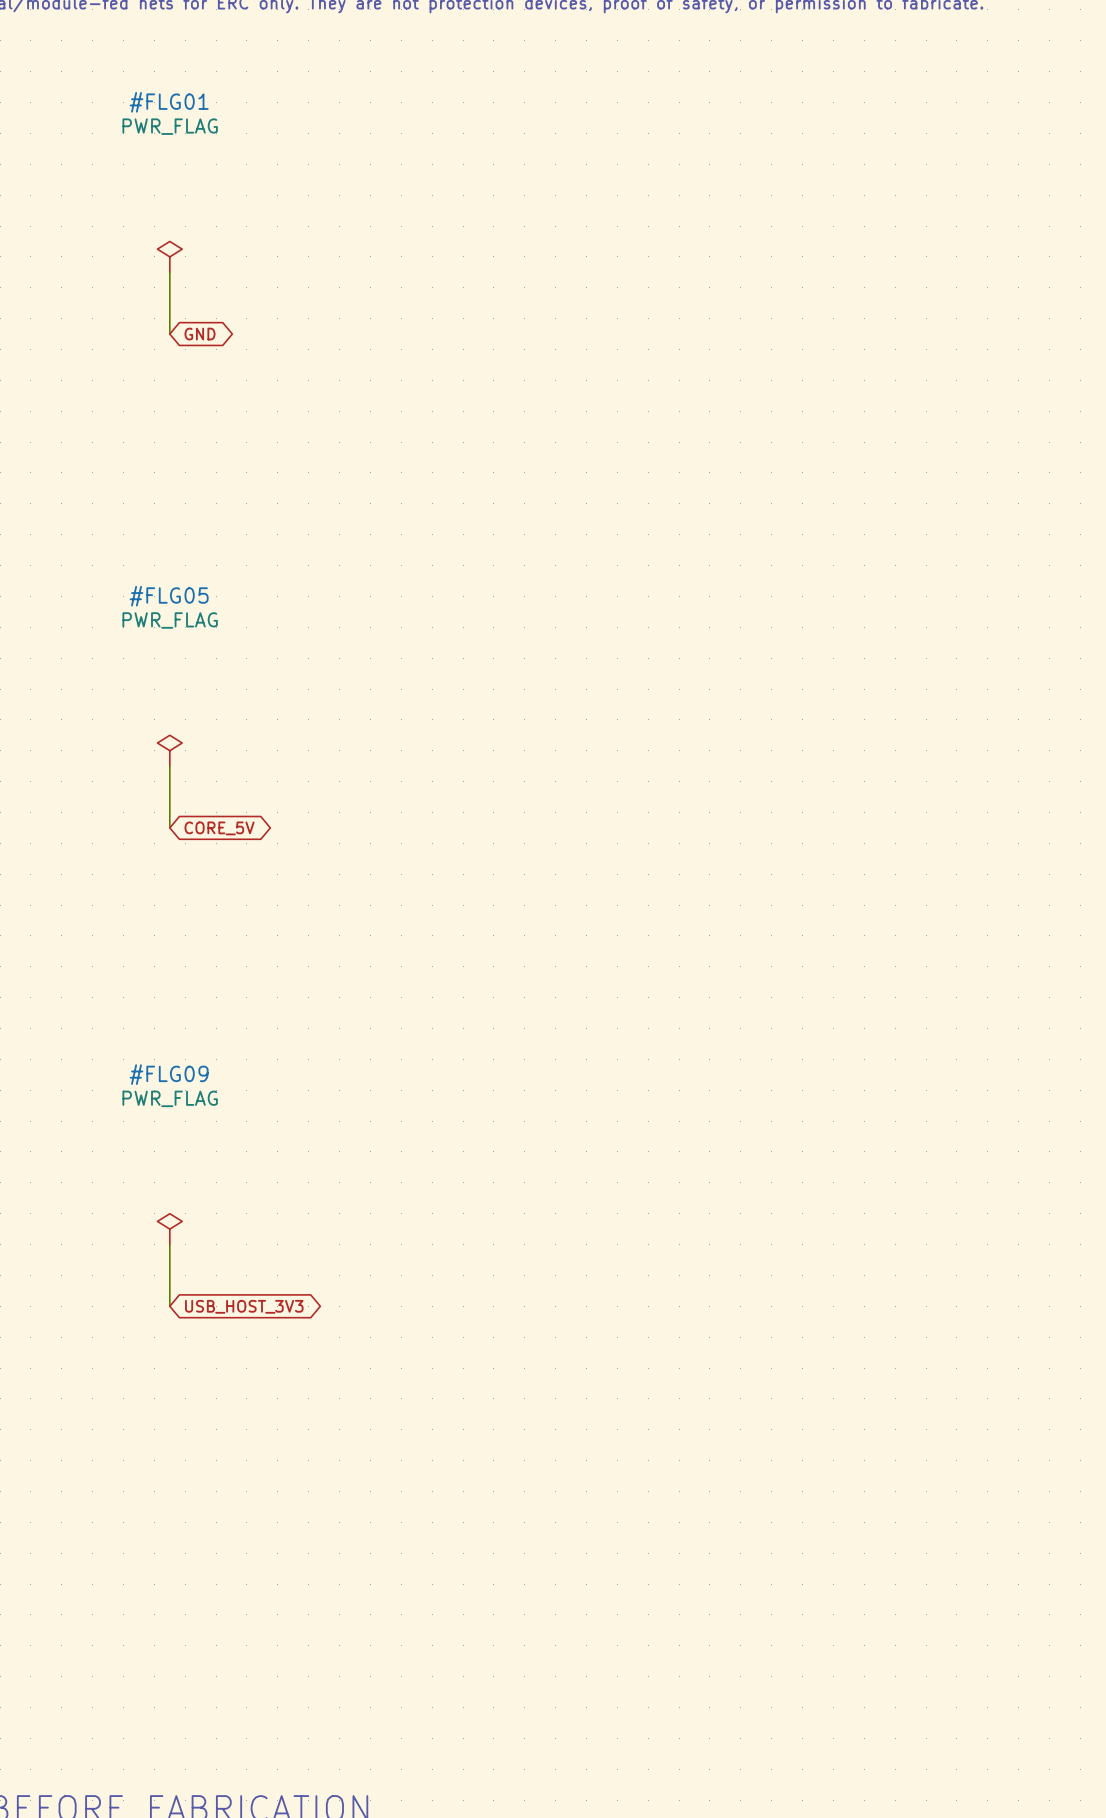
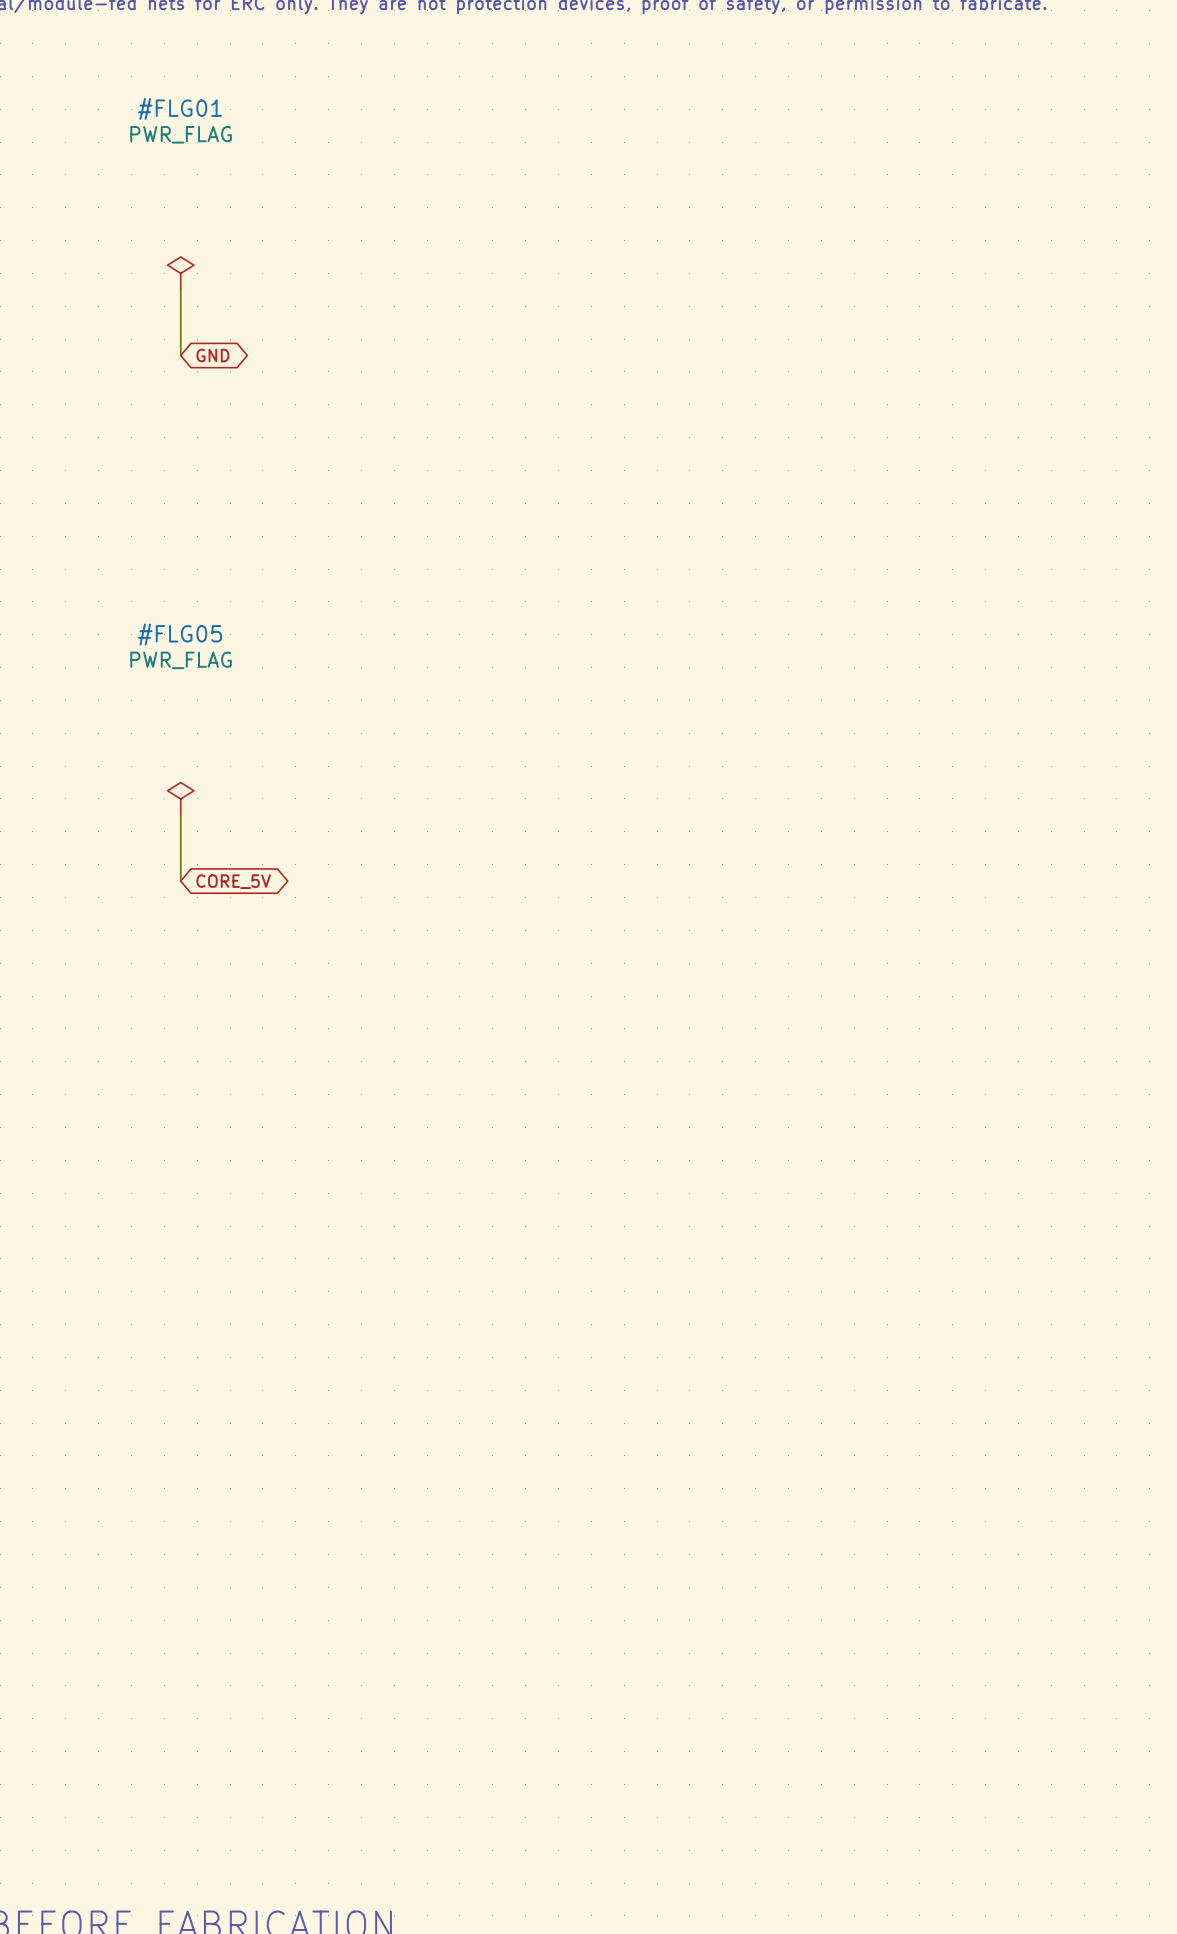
#FLG09: PWR_FLAG (169, 1229) -> none
wire: (169, 1244) (169, 1306) -> none
global label: USB_HOST_3V3 (244, 1306) -> none

